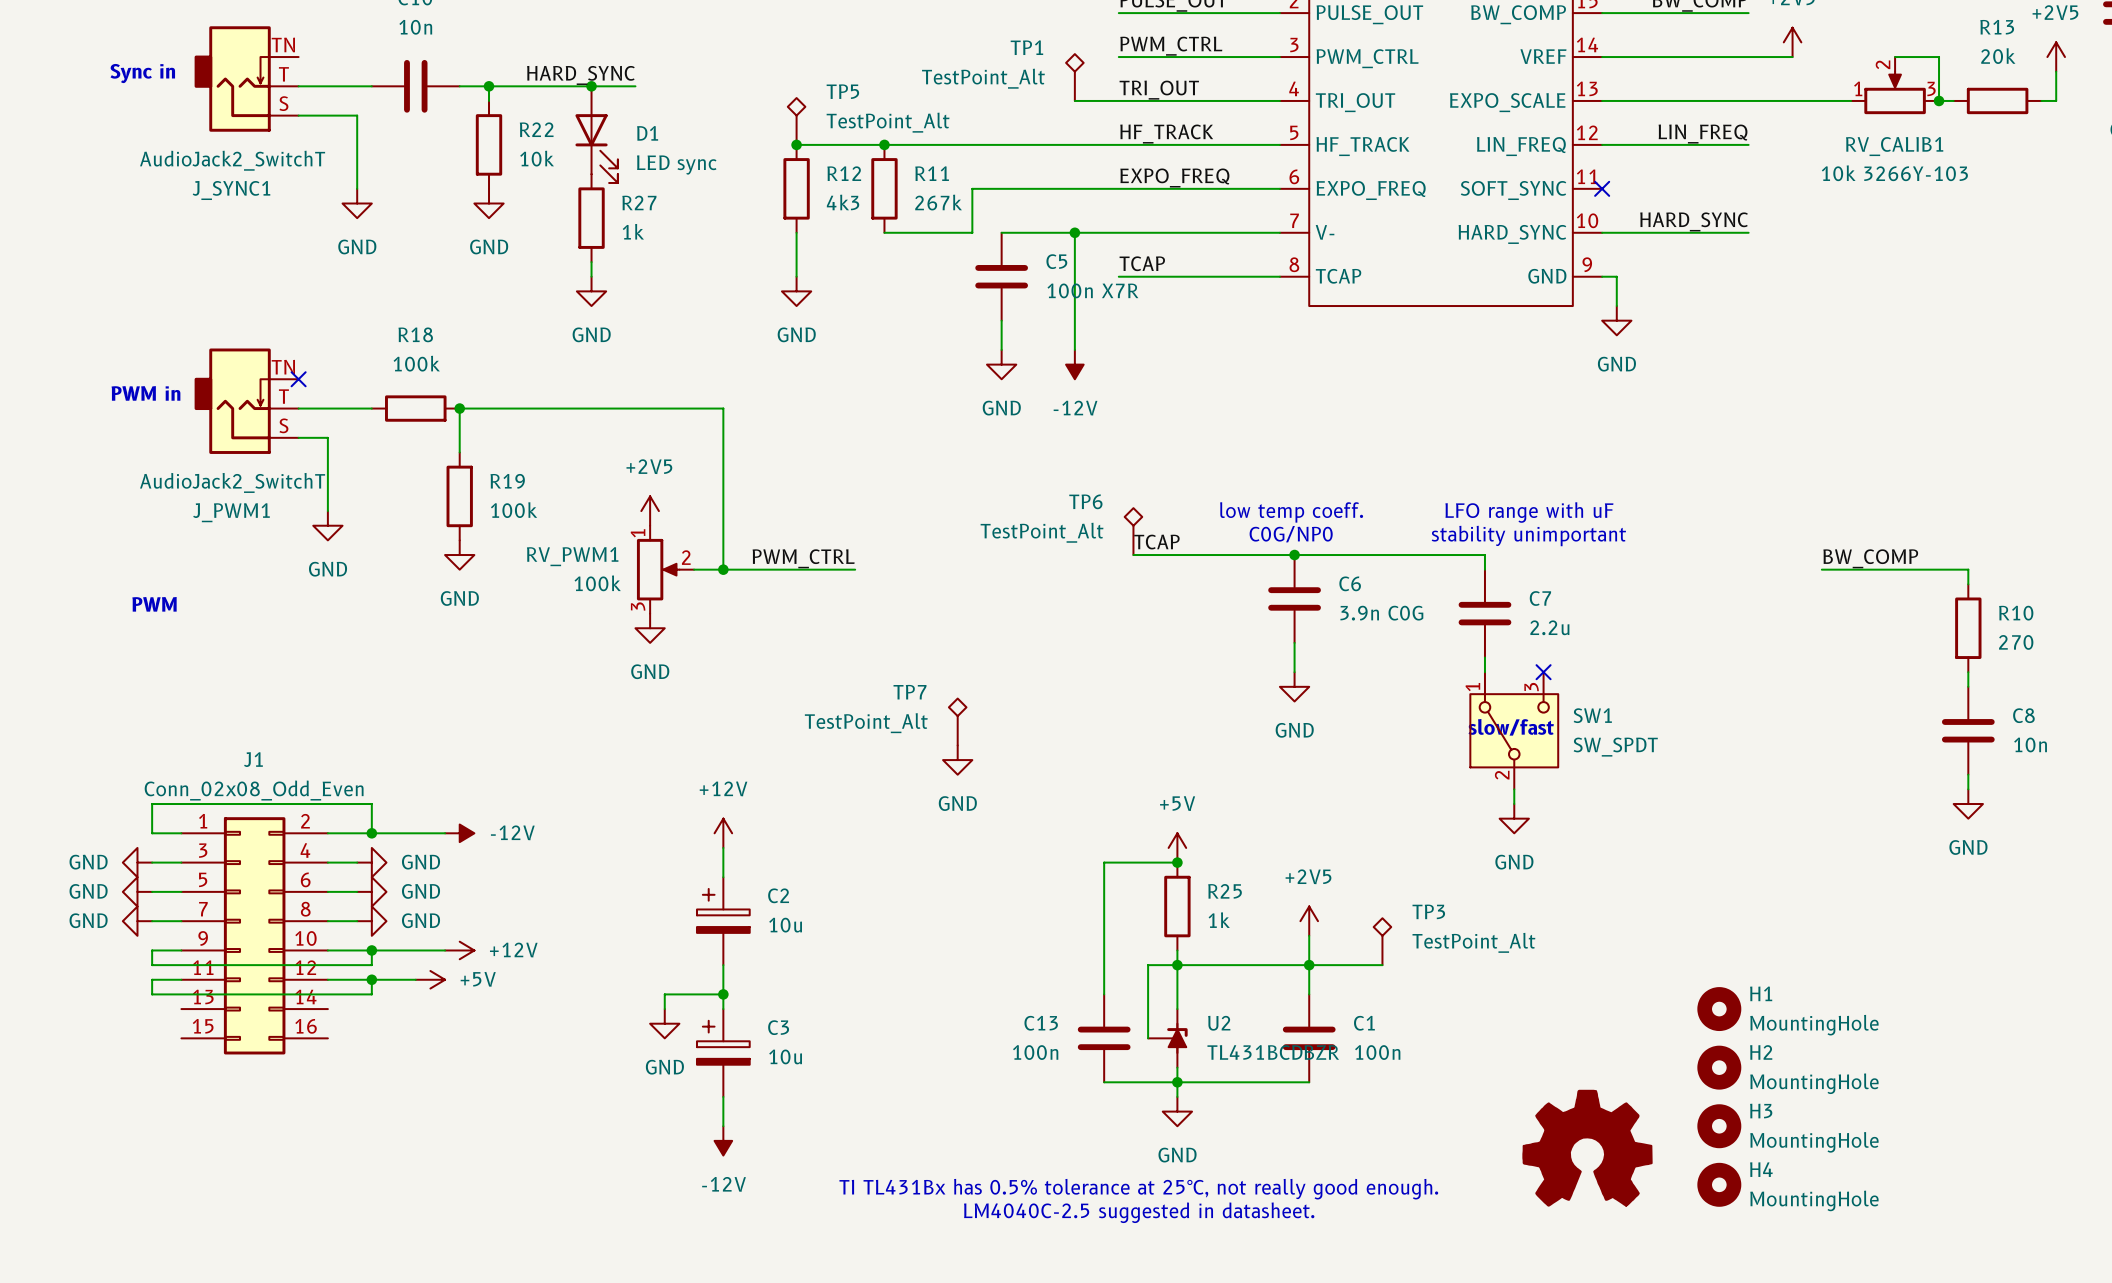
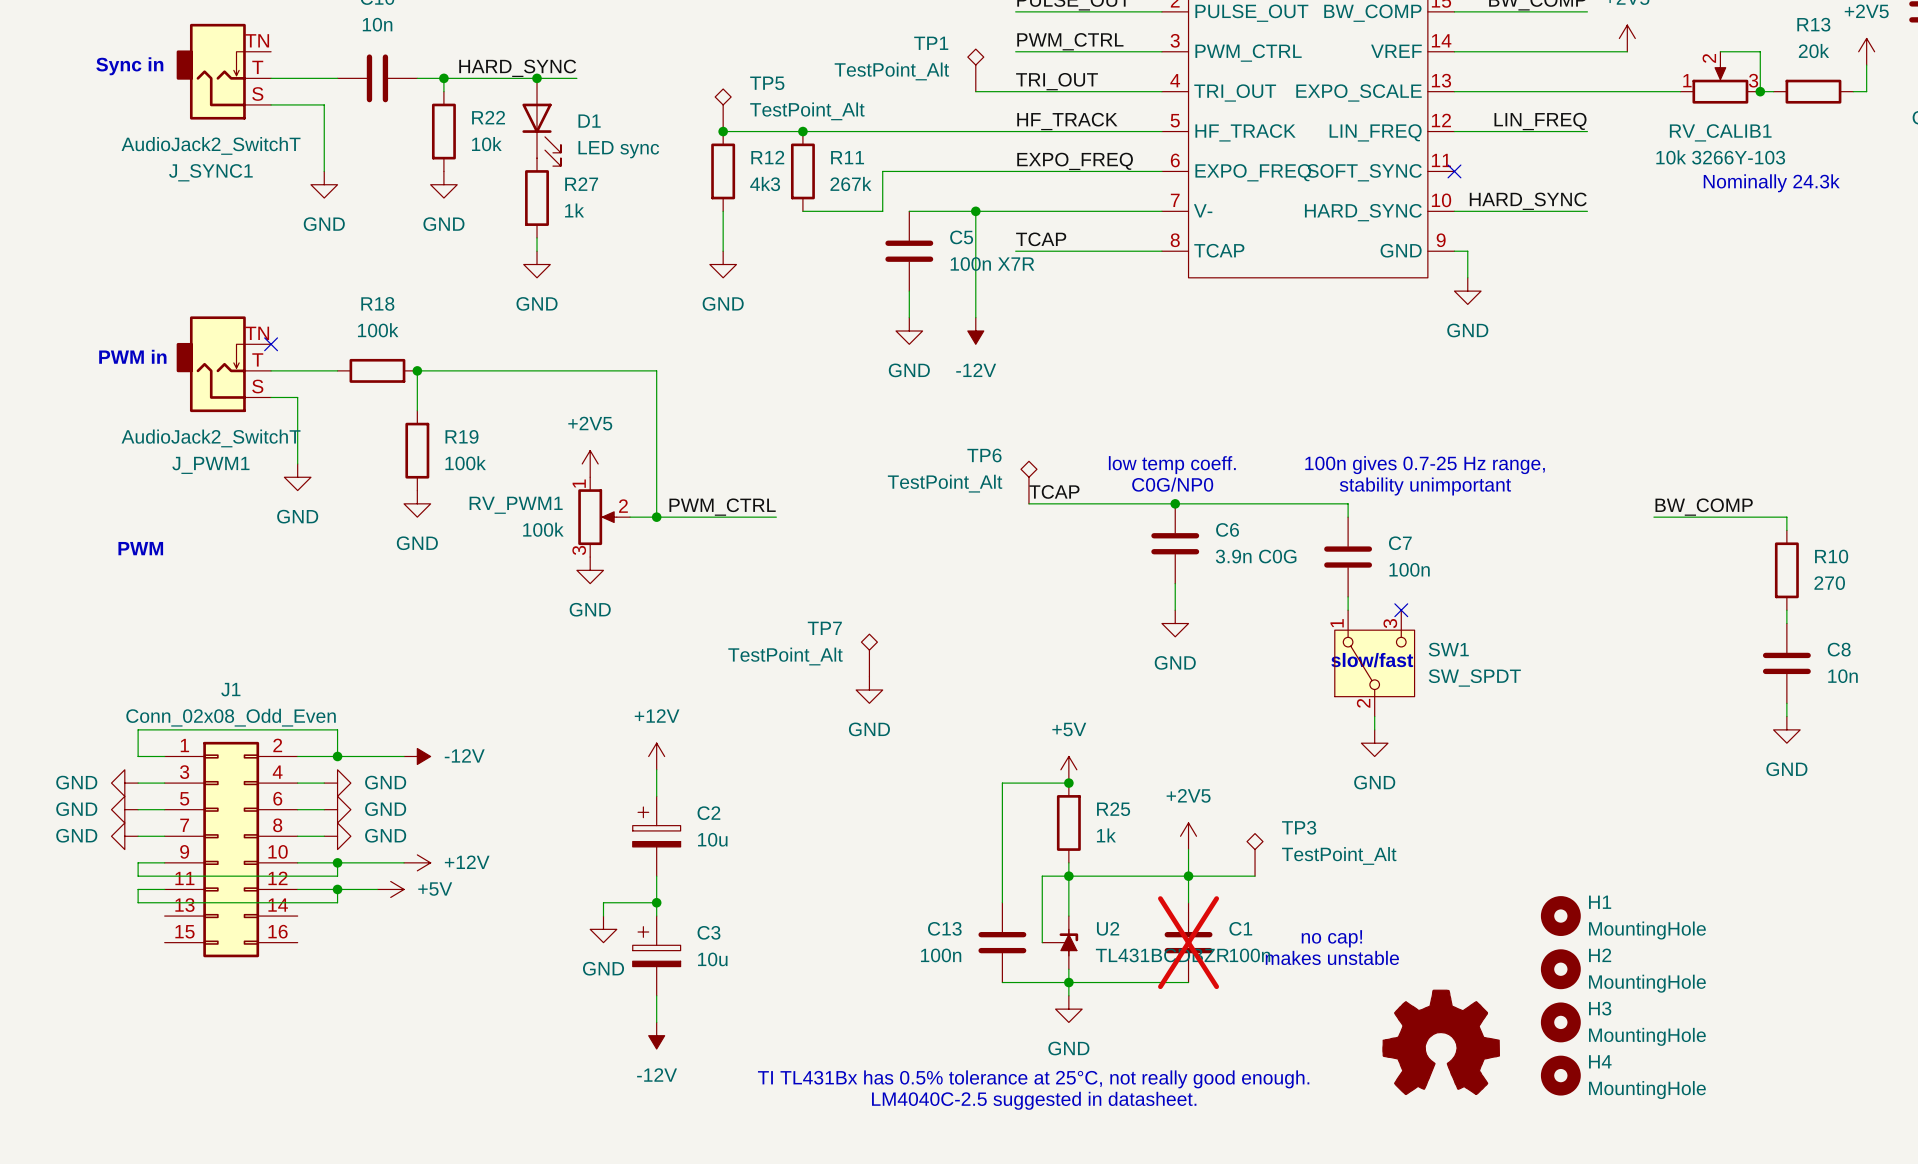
text: none -> Nominally 24.3k (1771, 183)
text: LFO range with uF (1529, 512) -> none
text: none -> 100n gives 0.7-25 Hz range, (1425, 465)
text position: stability unimportant (1528, 536) -> stability unimportant (1425, 486)
C7 value: 2.2u (1549, 627) -> 100n (1409, 569)
text: none -> no cap! (1331, 938)
C1 do-not-place cross: none -> (1188, 942)
text: none -> makes unstable (1332, 957)

